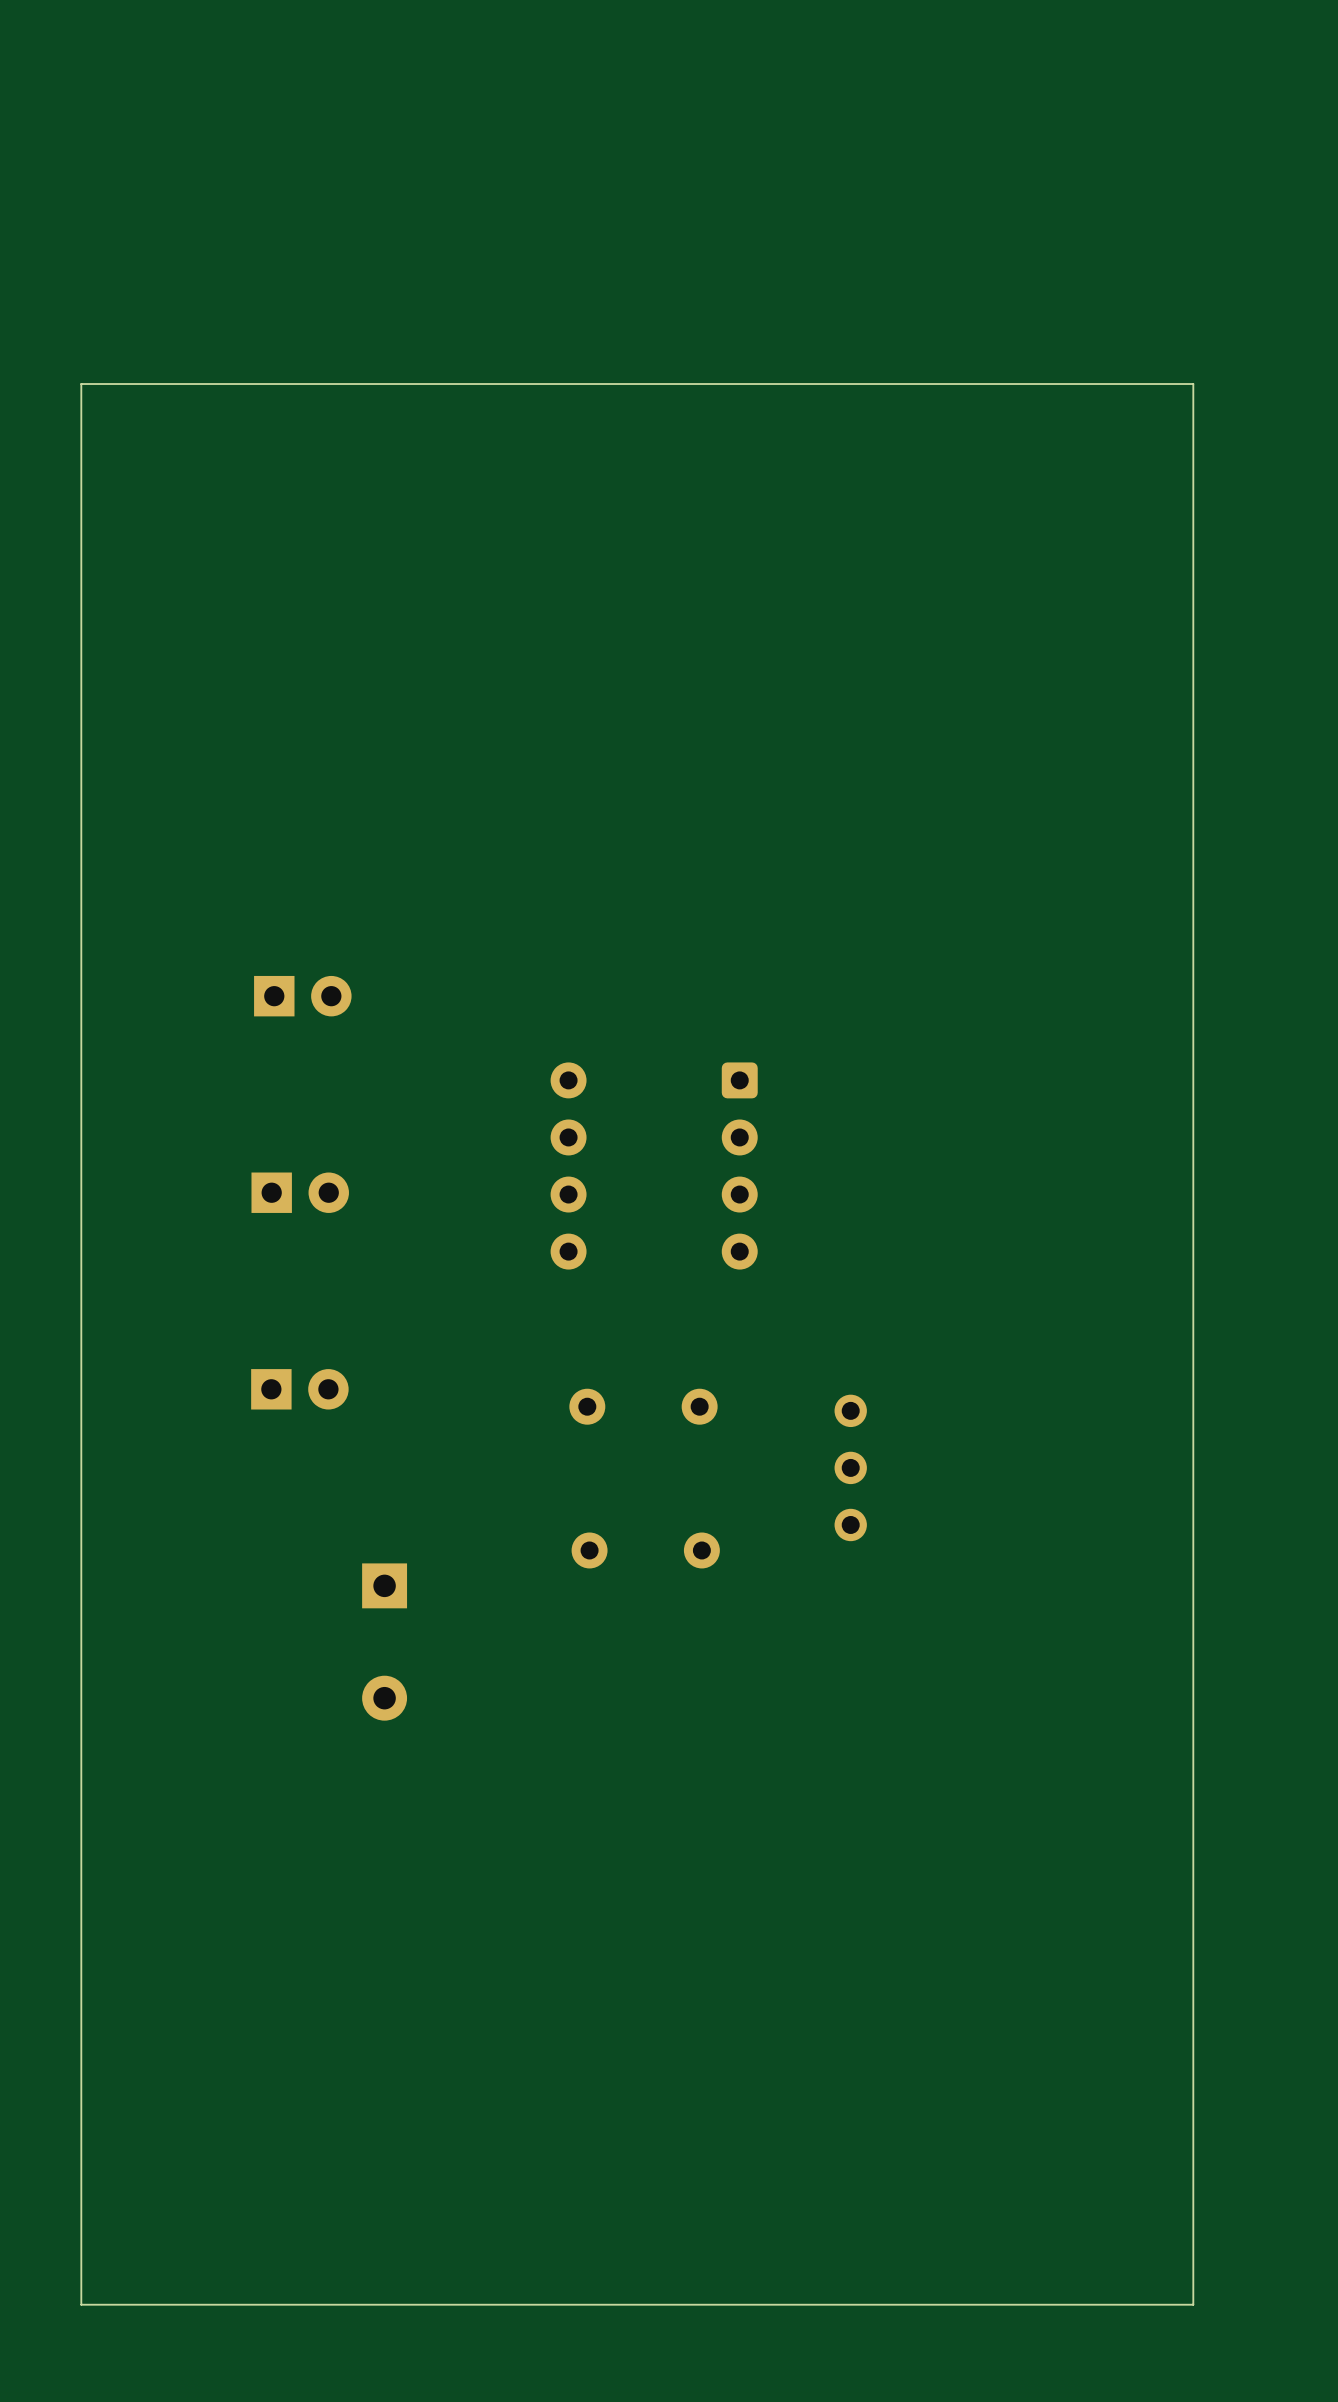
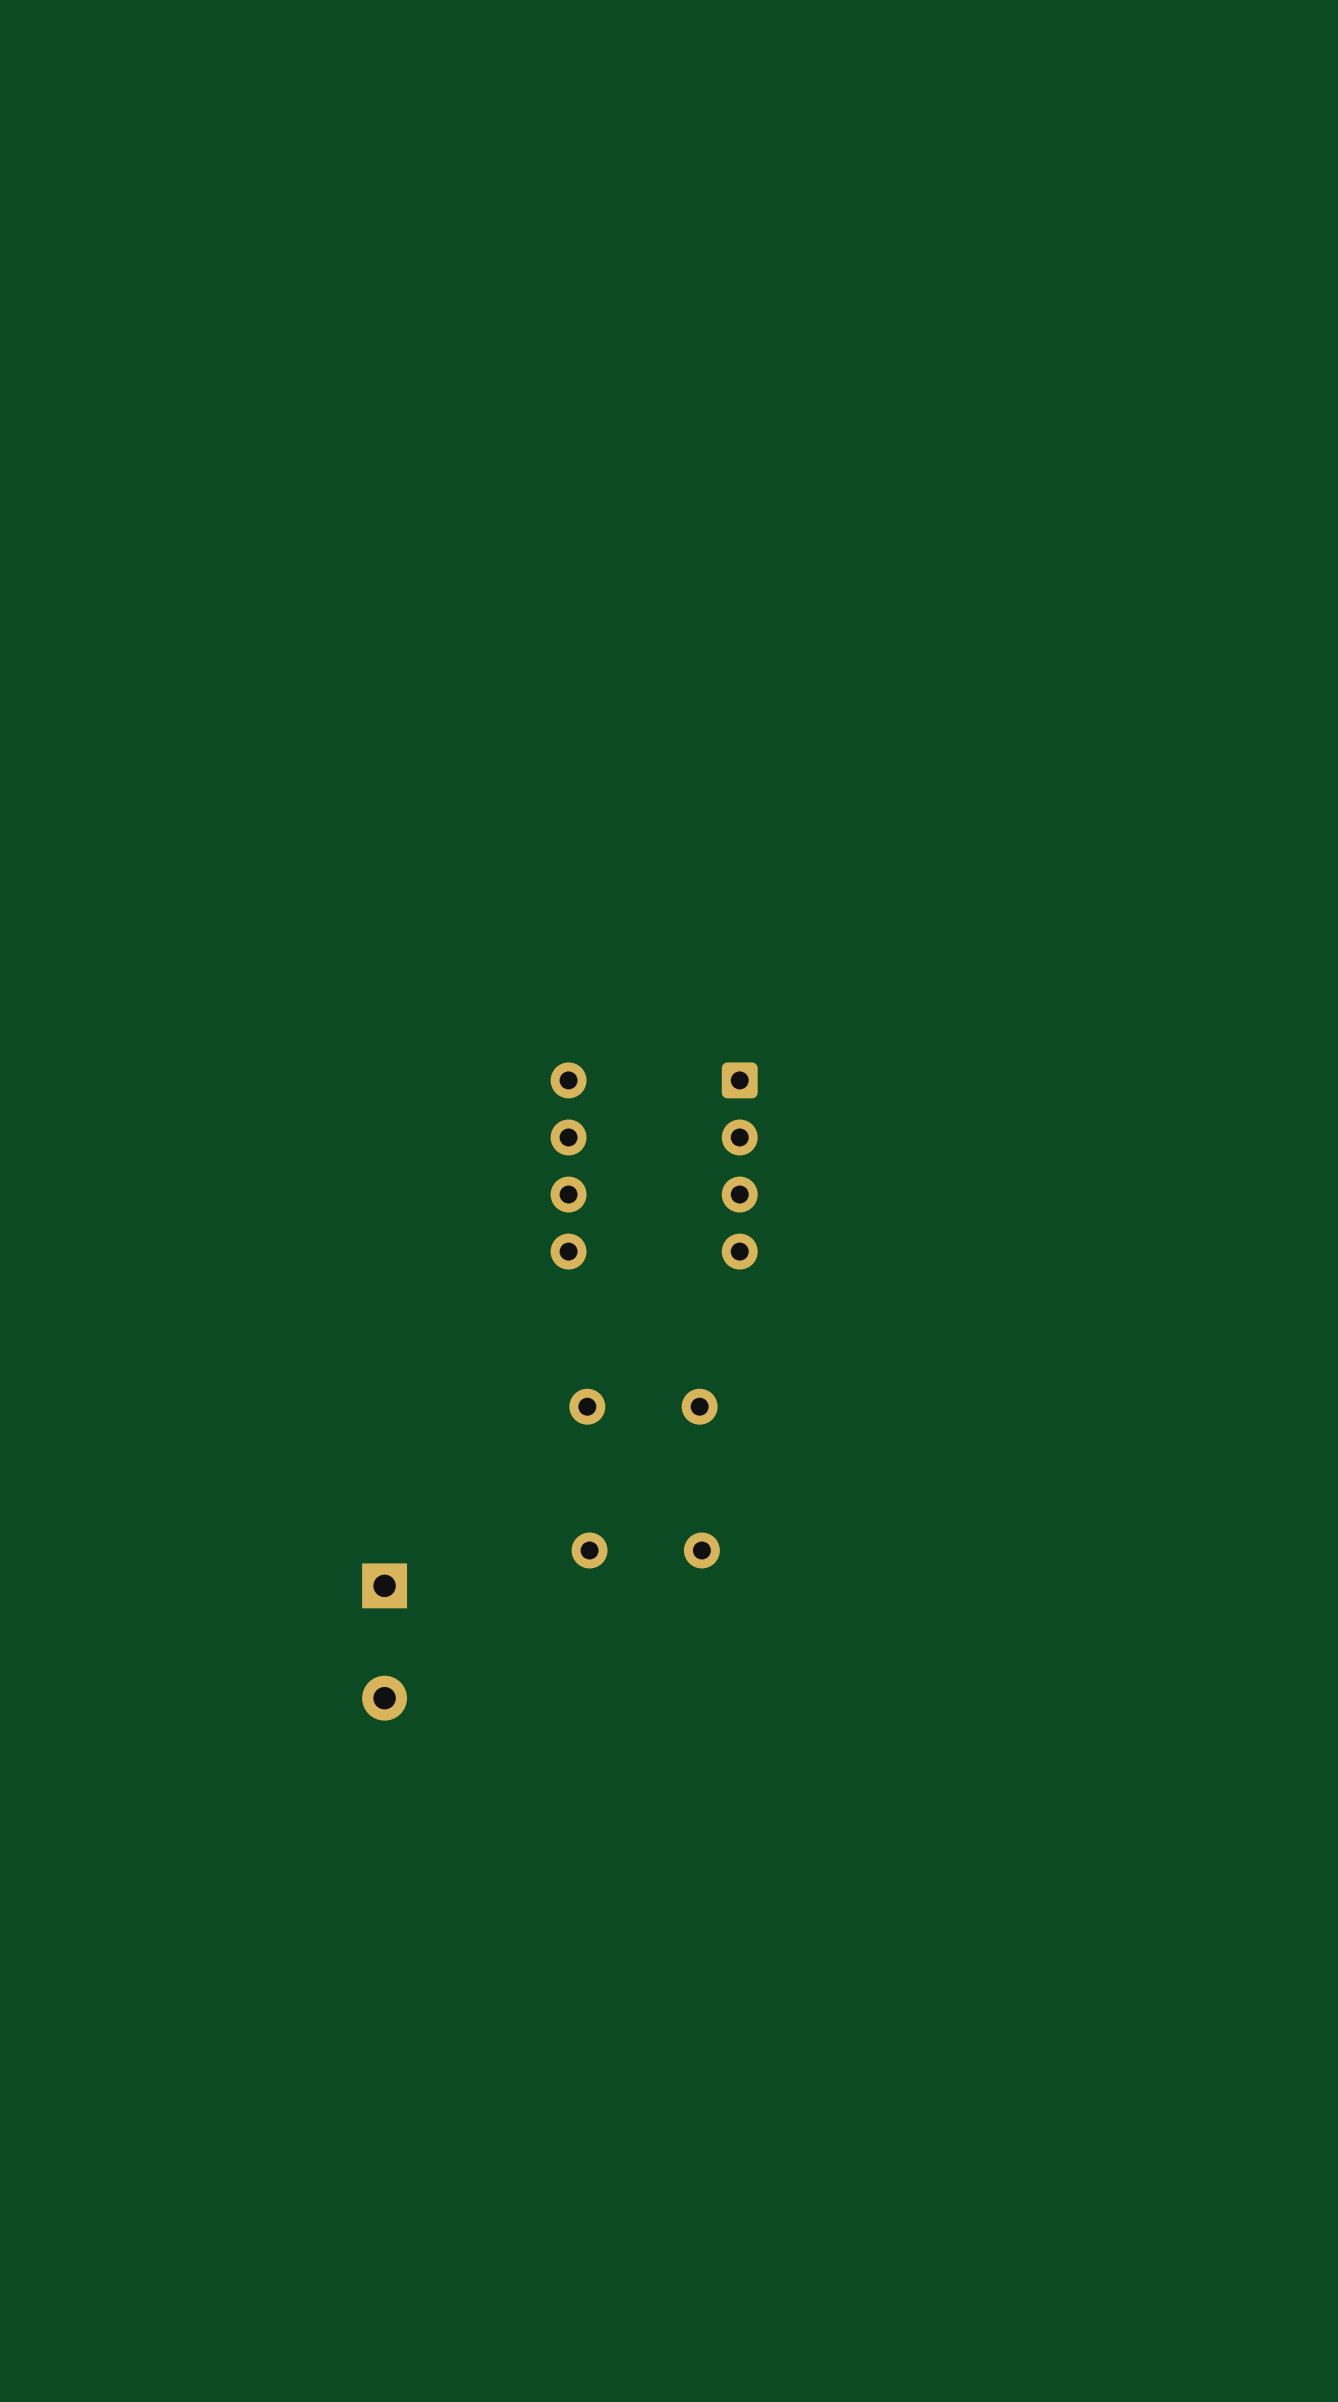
board edge: (1193, 384) (81, 384) (81, 2304) (1193, 2304) (1193, 384) -> none
part: (302, 996) -> none
part: (300, 1192) -> none
part: (299, 1389) -> none
part: (850, 1467) -> none

